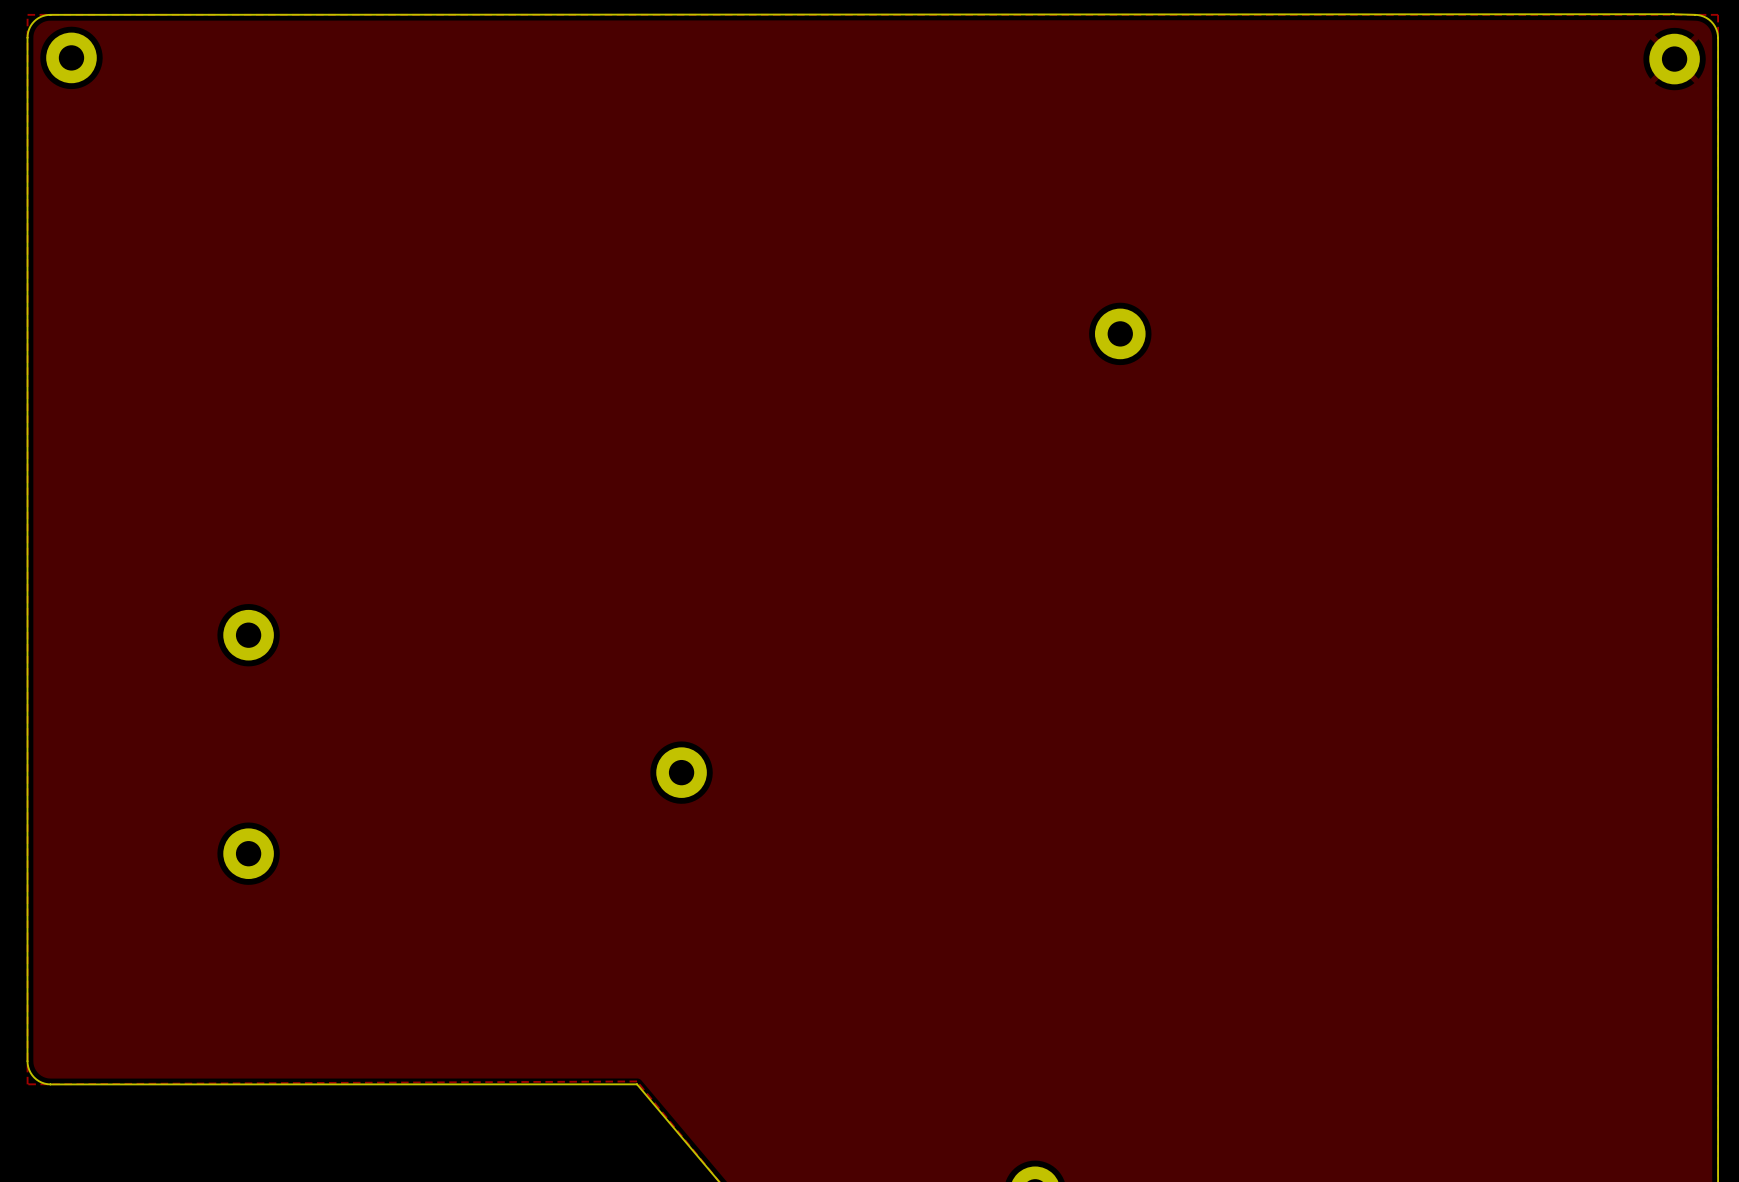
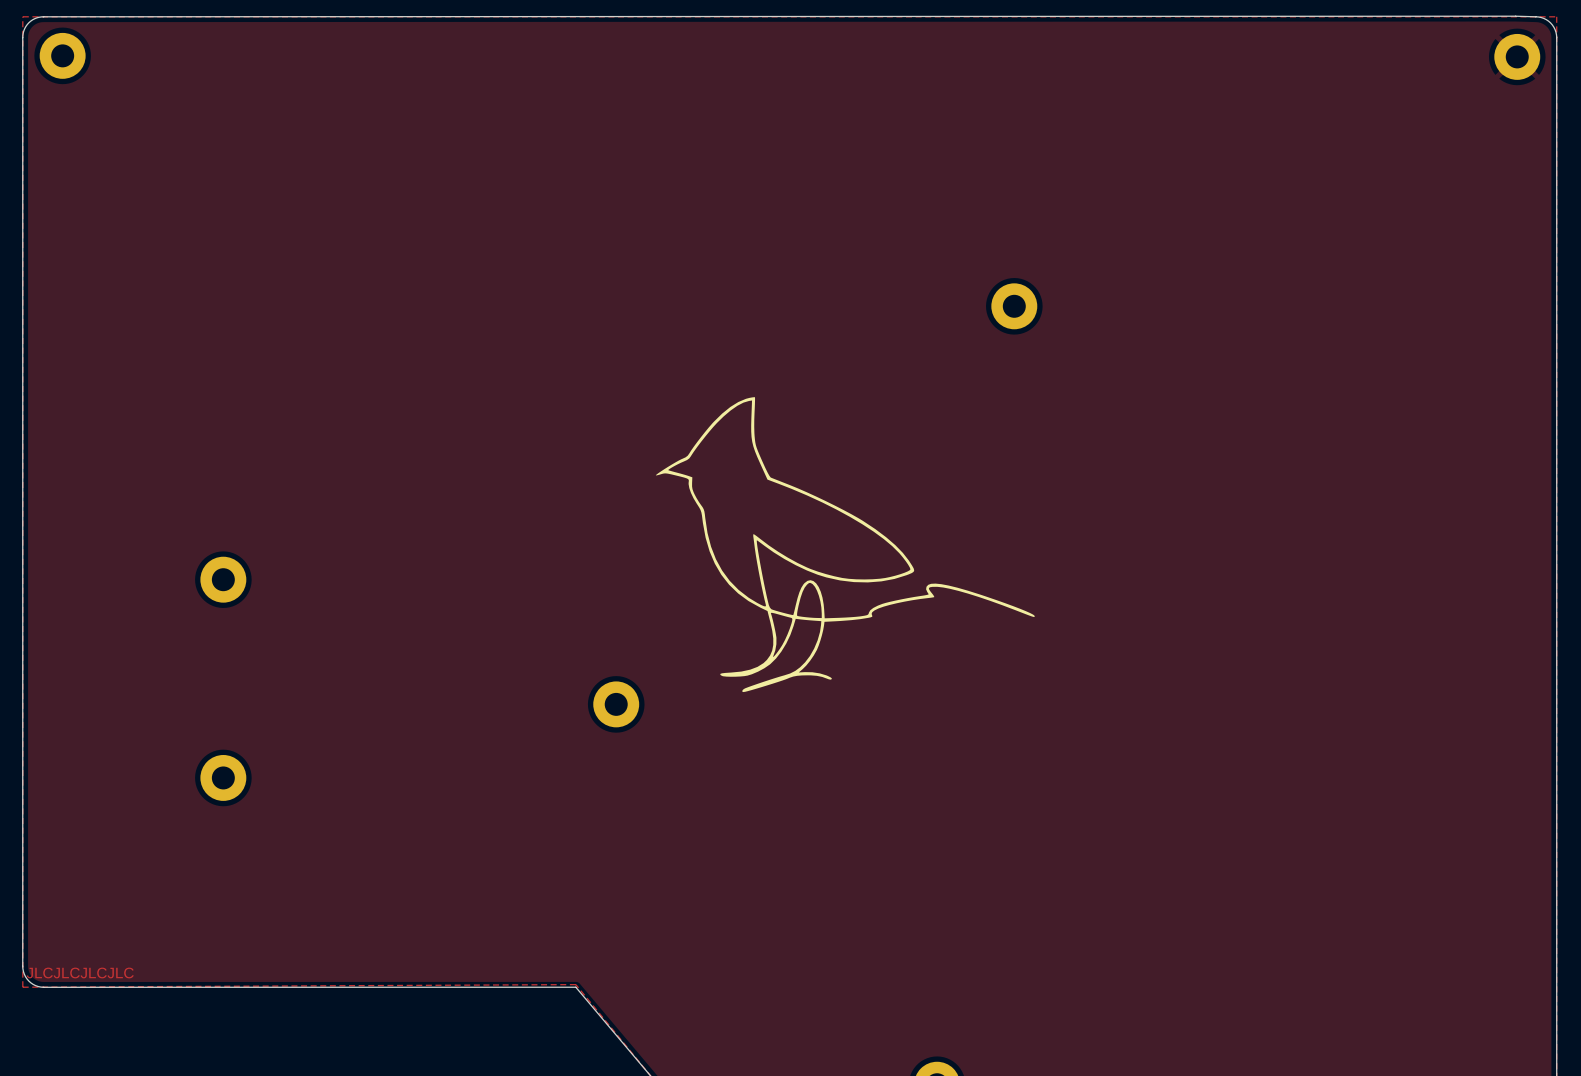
drawing: none -> [655, 397, 1035, 693]
text: none -> JLCJLCJLCJLC (80, 973)

